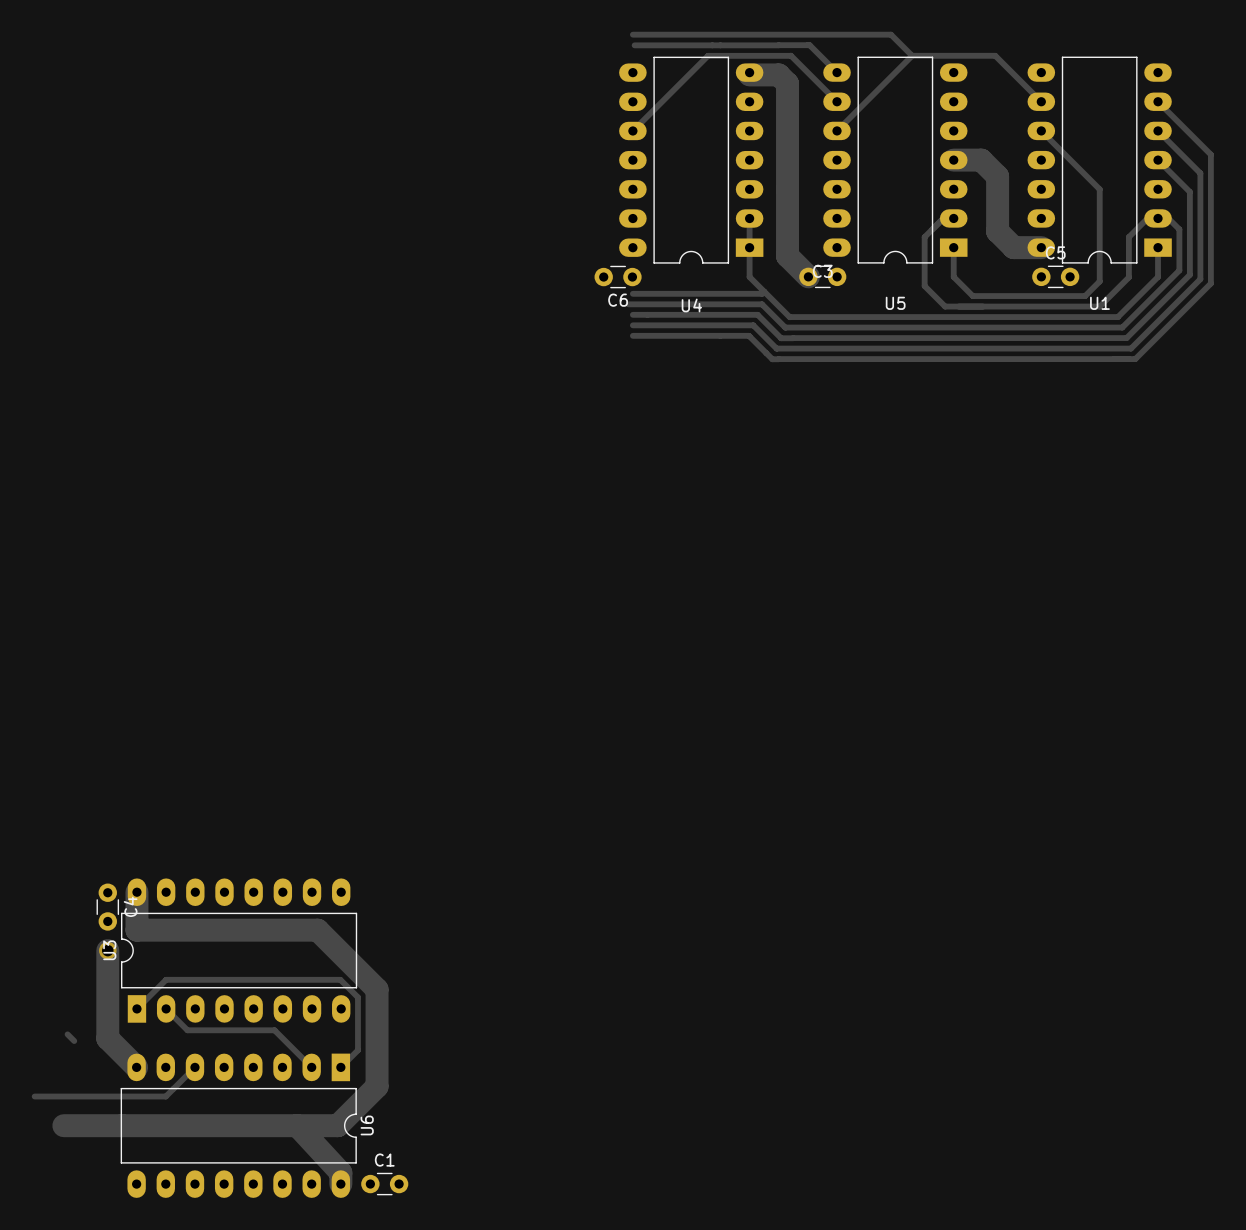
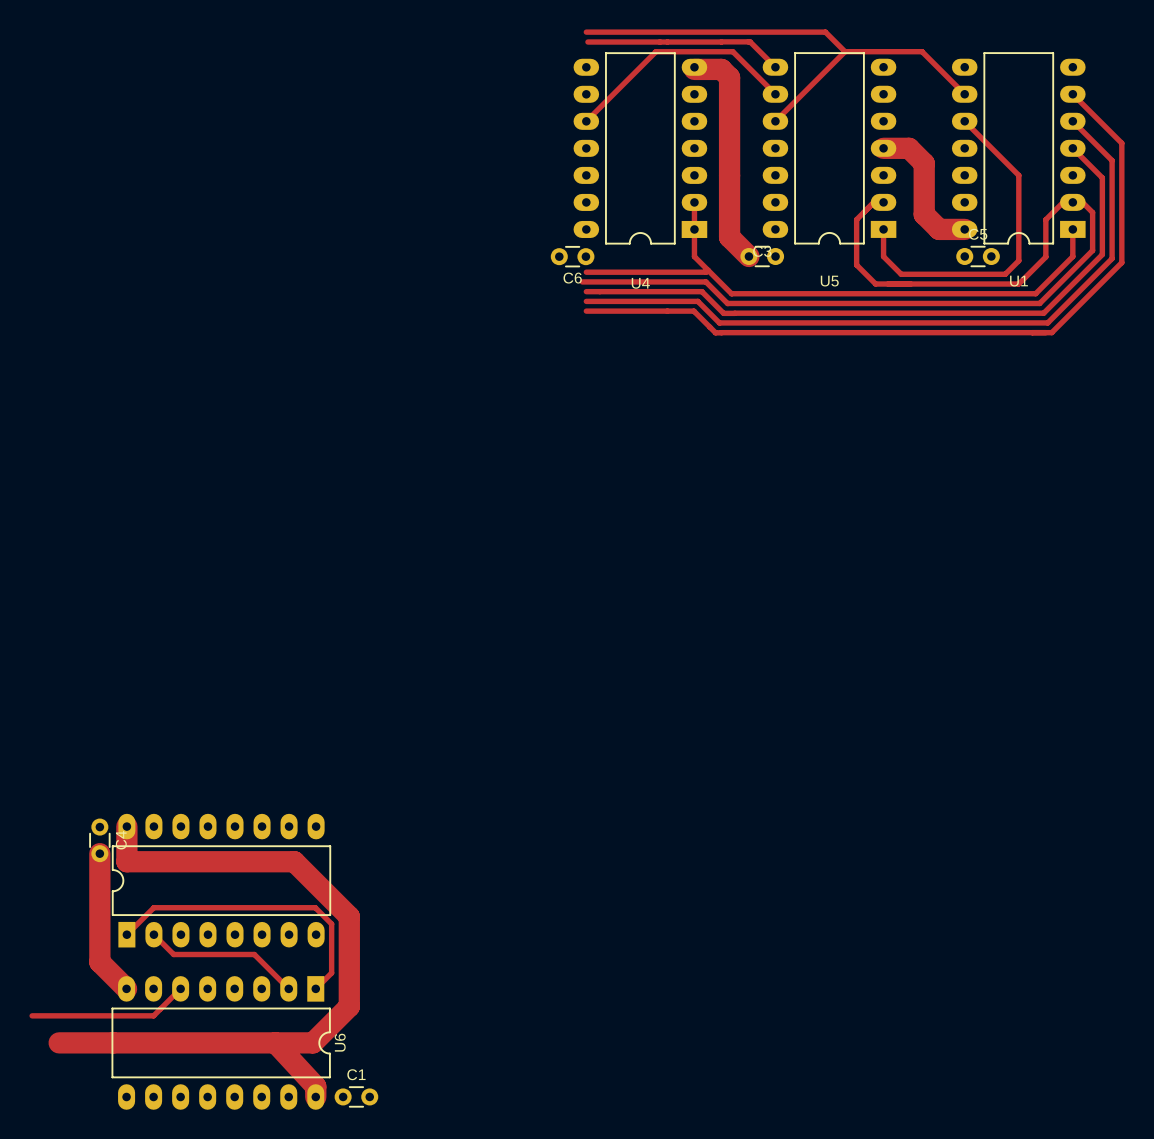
track: none -> (99, 853) (99, 880)
via: (107, 950) -> none
U3 name: U3 (109, 950) -> none
track: (67, 1034) (74, 1041) -> none

